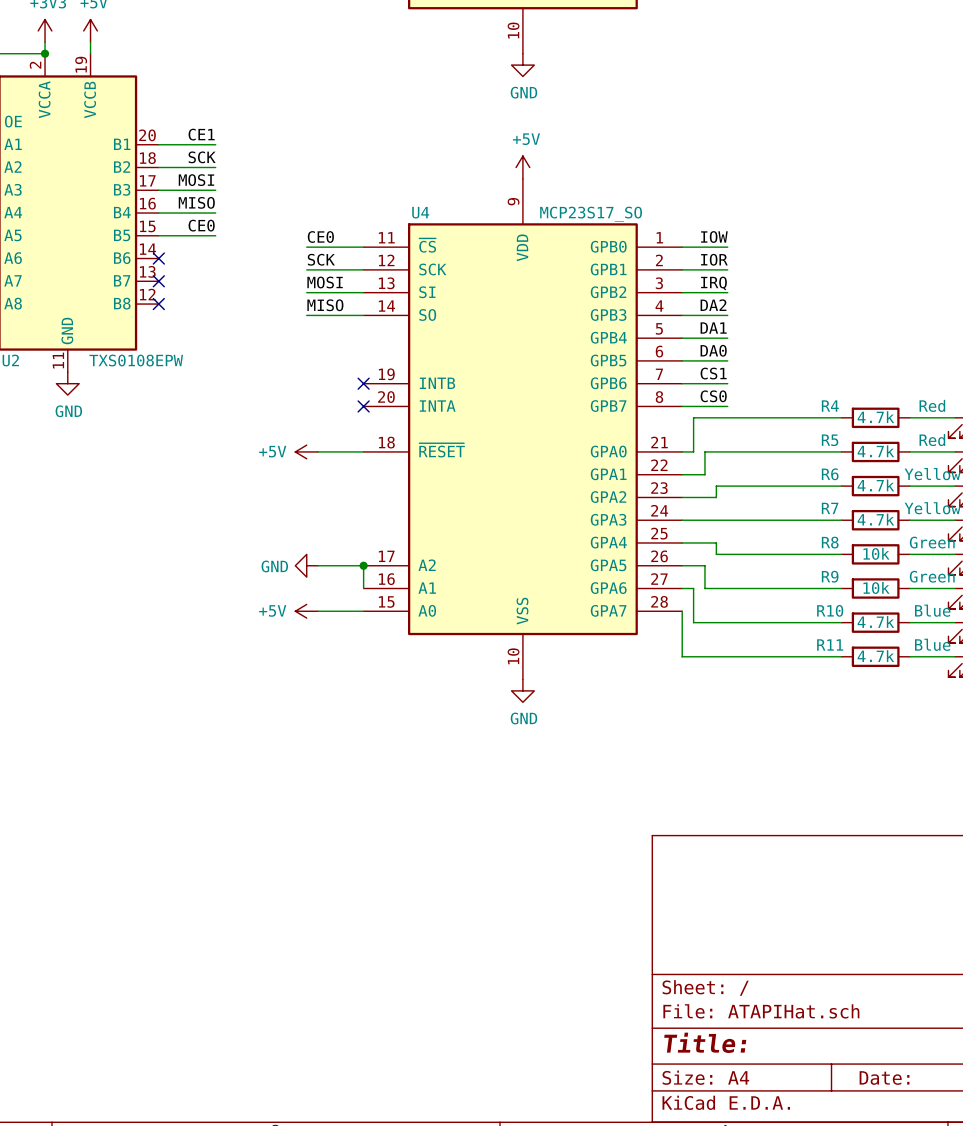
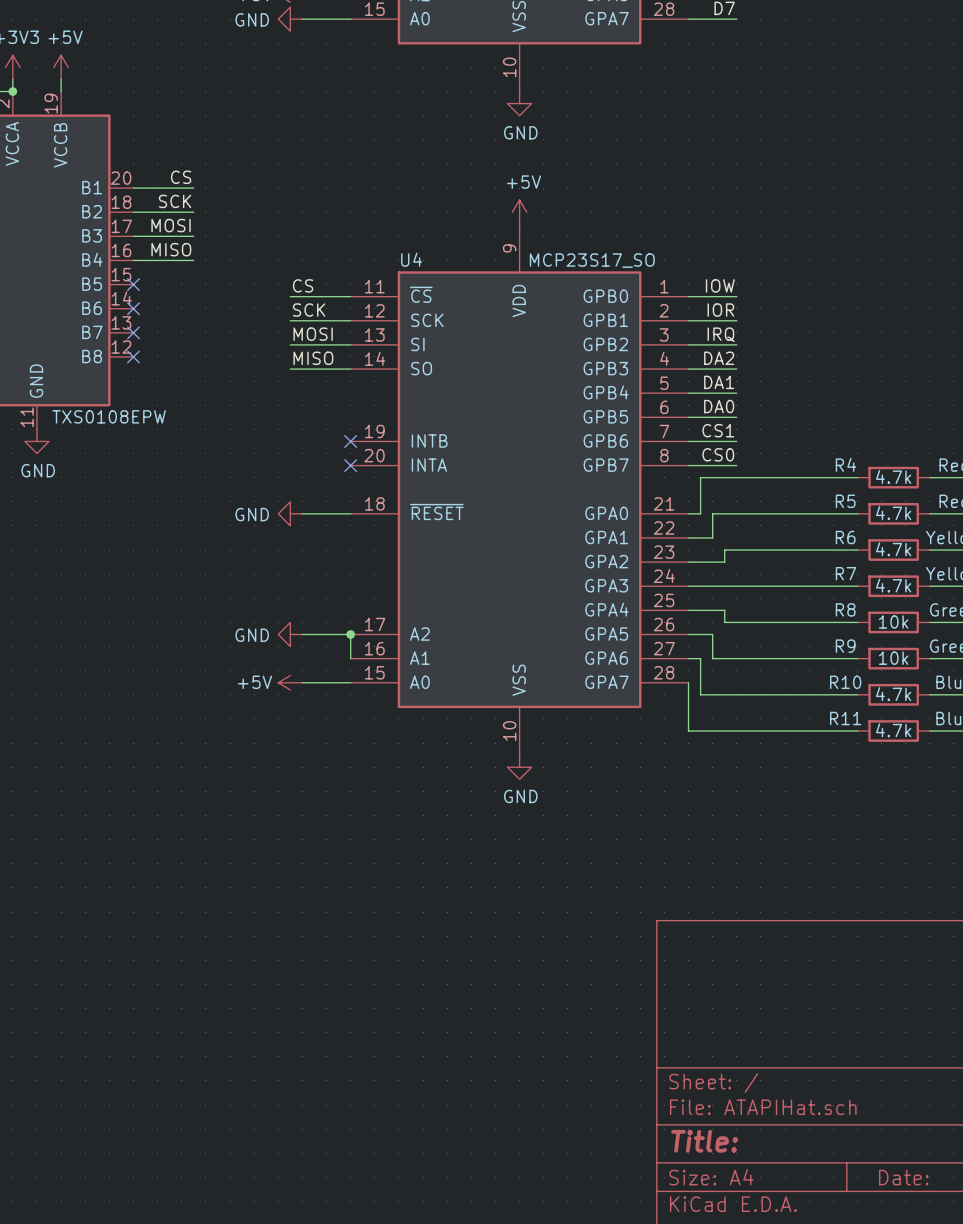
label: CE1 (201, 134) -> CS (181, 177)
label: CE0 (201, 225) -> none
wire: (158, 235) (215, 235) -> none
no-connect mark: none -> (133, 284)
label: CE0 (320, 237) -> CS (303, 285)
power symbol: +5V (306, 451) -> GND (290, 513)

